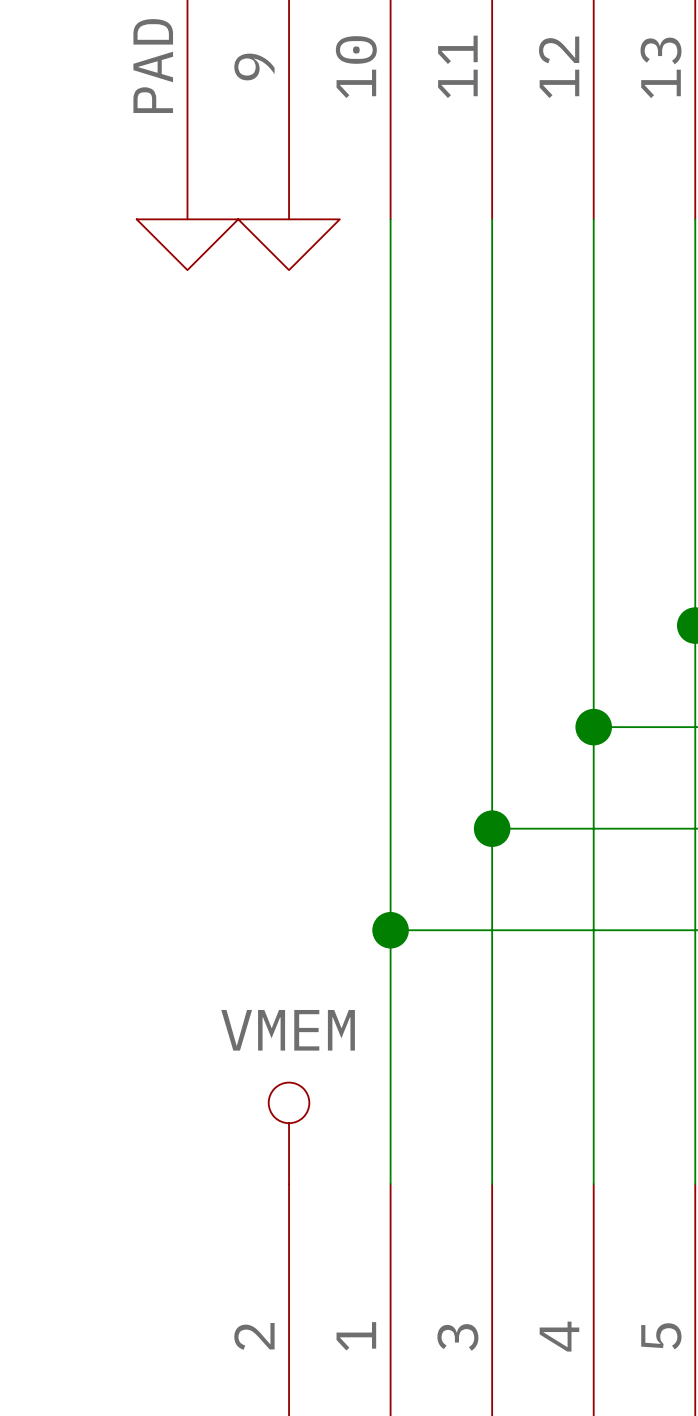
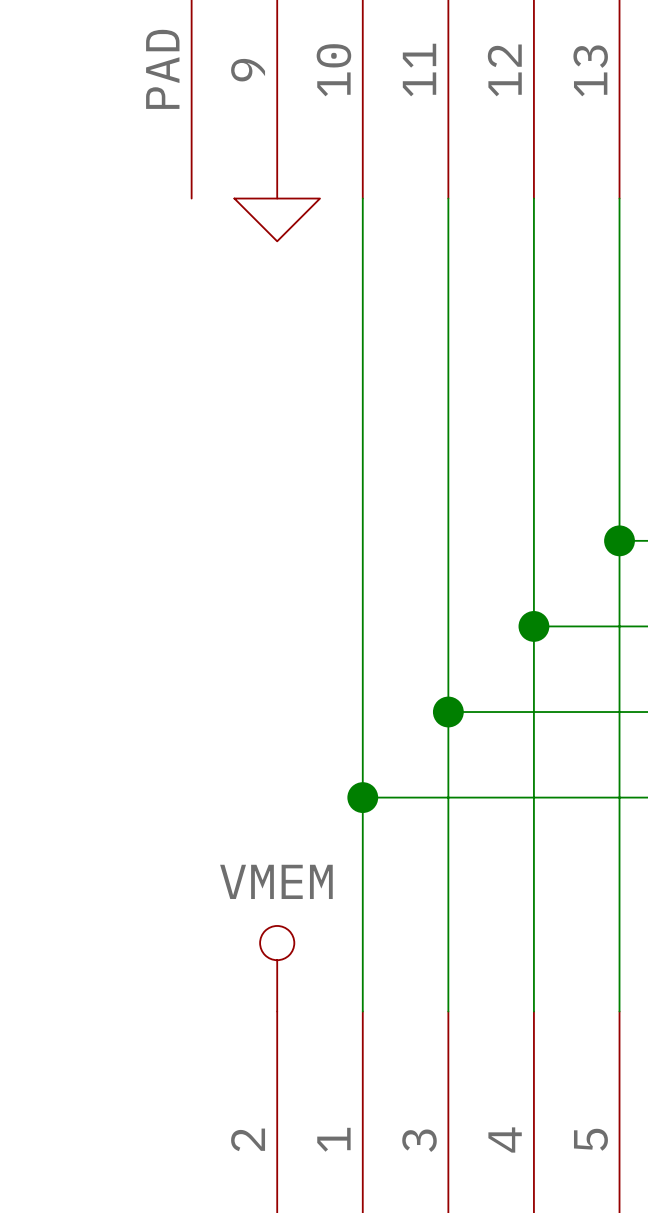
power symbol: (187, 244) -> none

